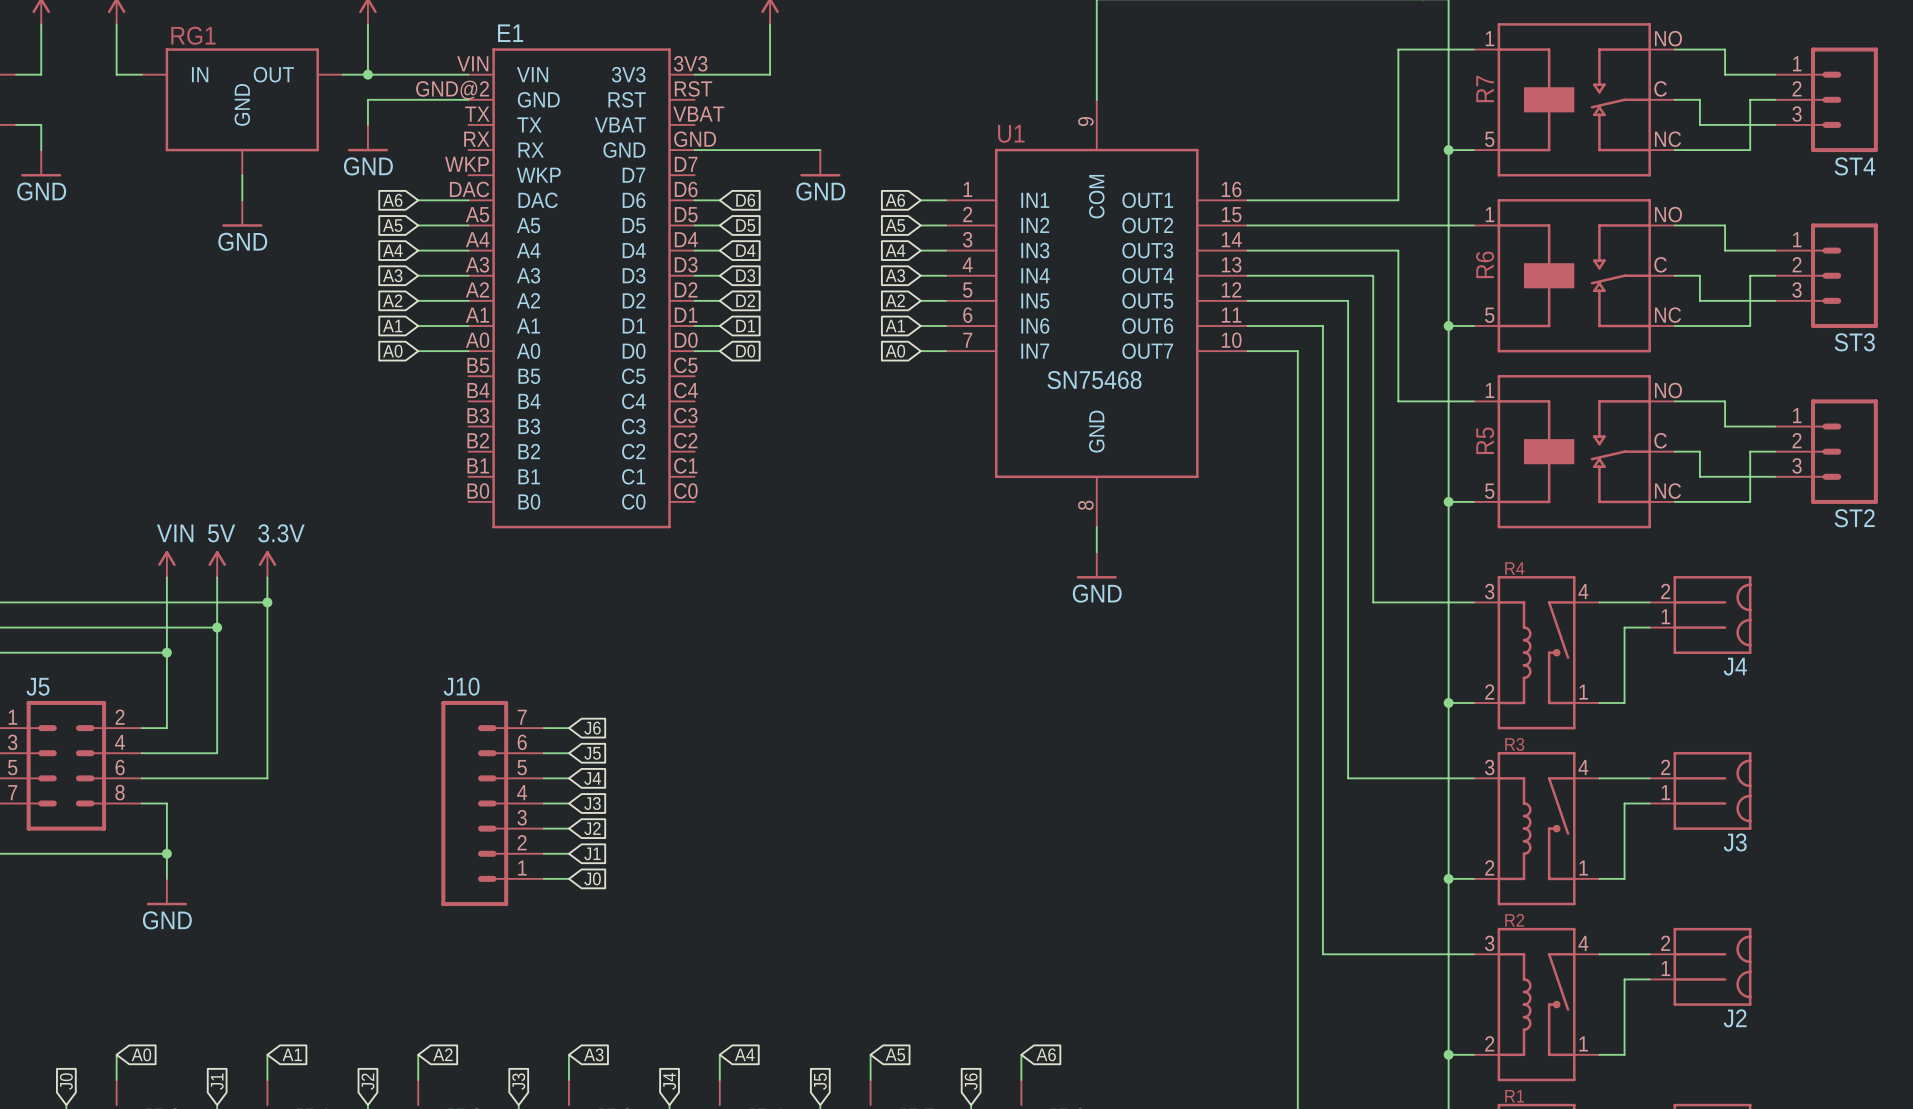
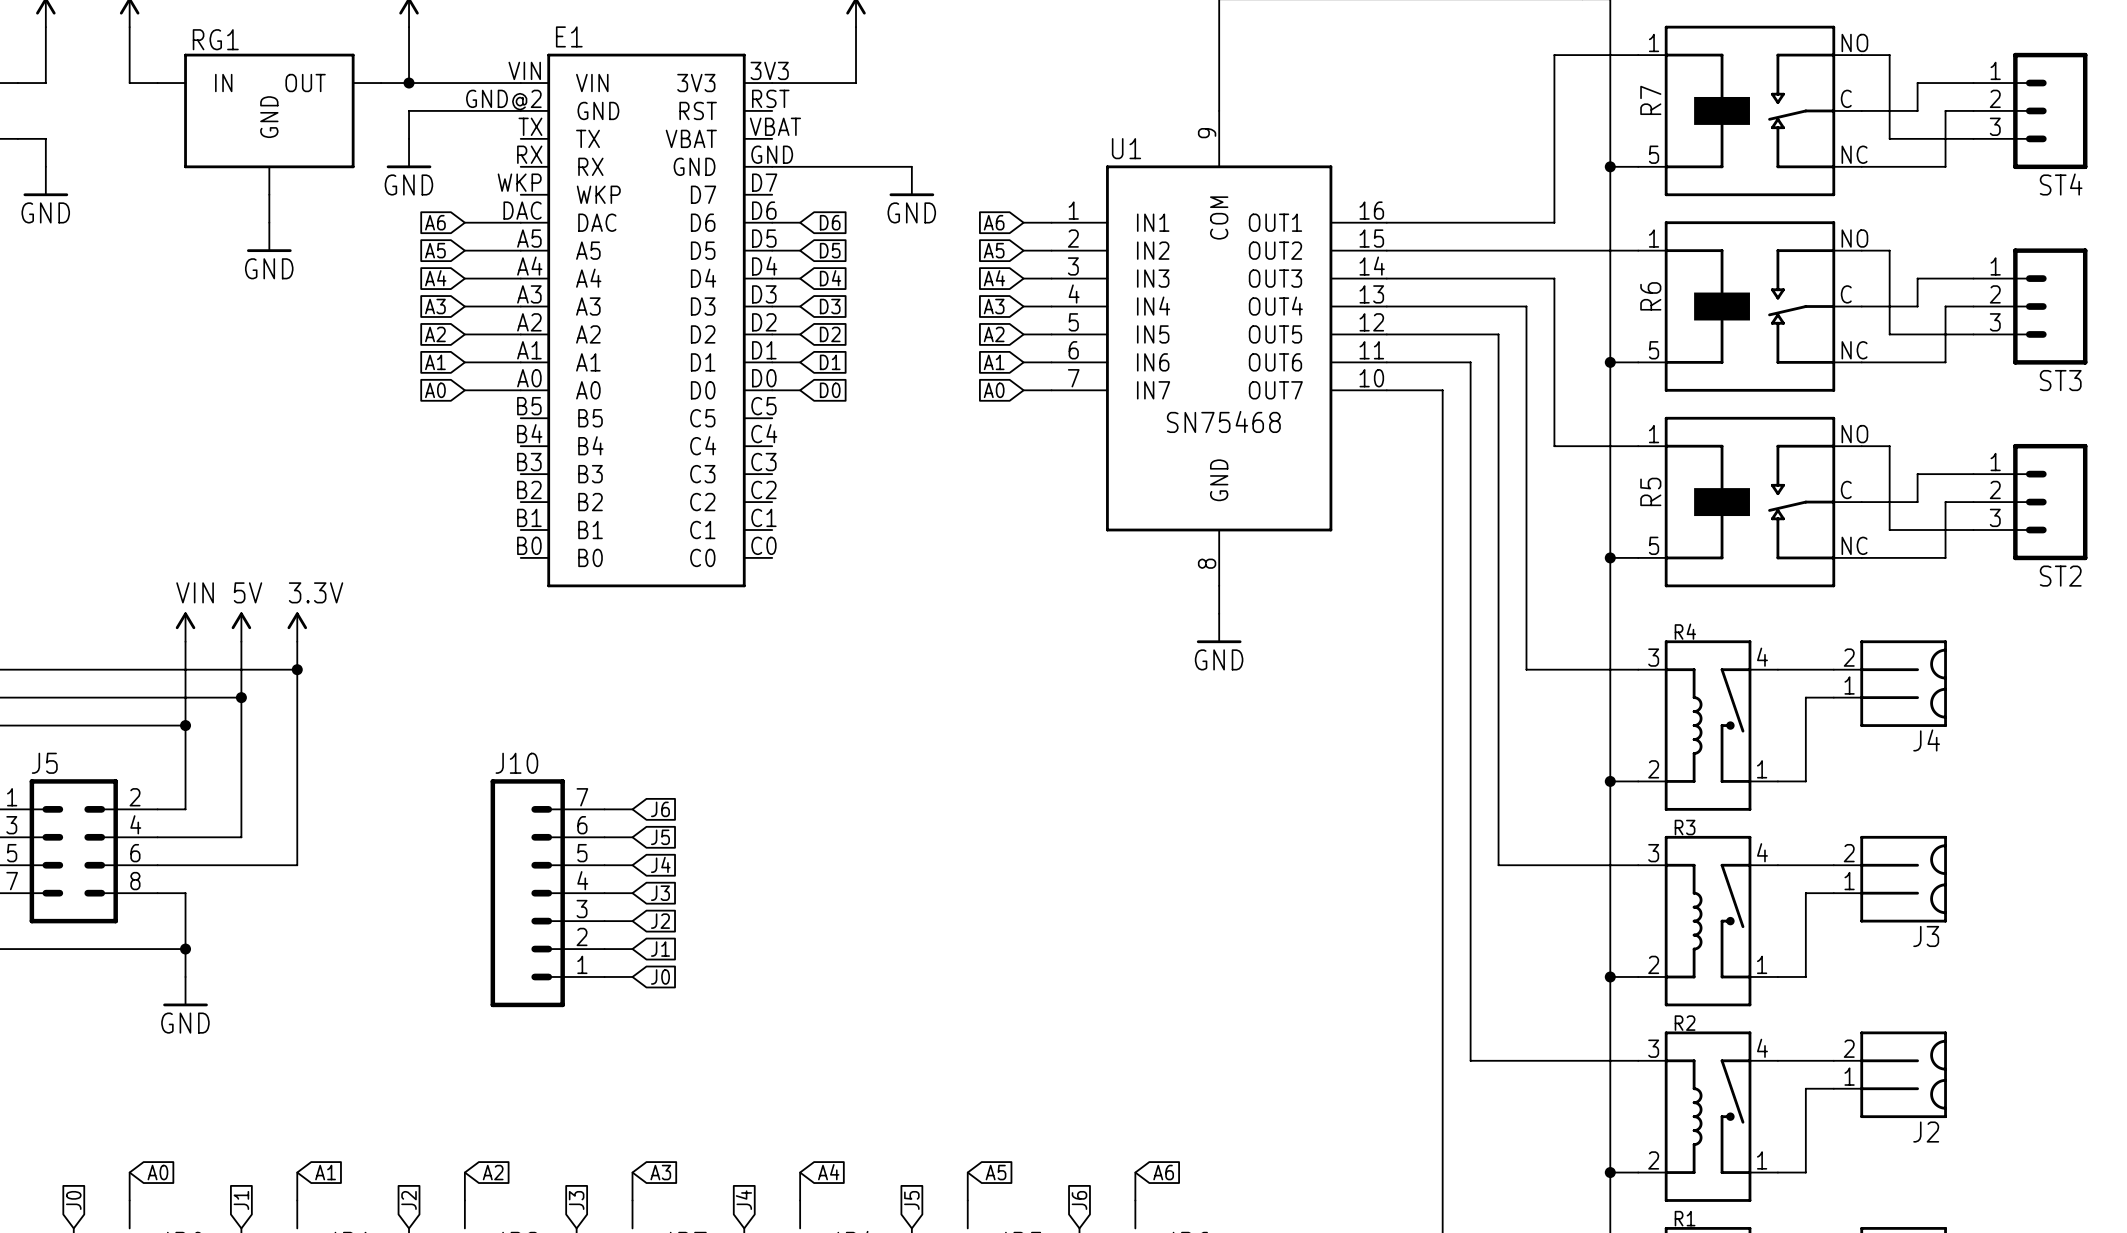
wire: (1699, 49) (1725, 49) (1725, 74) -> (1889, 55) (1889, 110) (1917, 110) (1917, 83)
wire: (1699, 225) (1725, 225) (1725, 250) -> (1889, 250) (1889, 306) (1917, 306) (1917, 278)
wire: (1699, 401) (1725, 401) (1725, 426) -> (1889, 446) (1889, 502) (1917, 502) (1917, 474)

